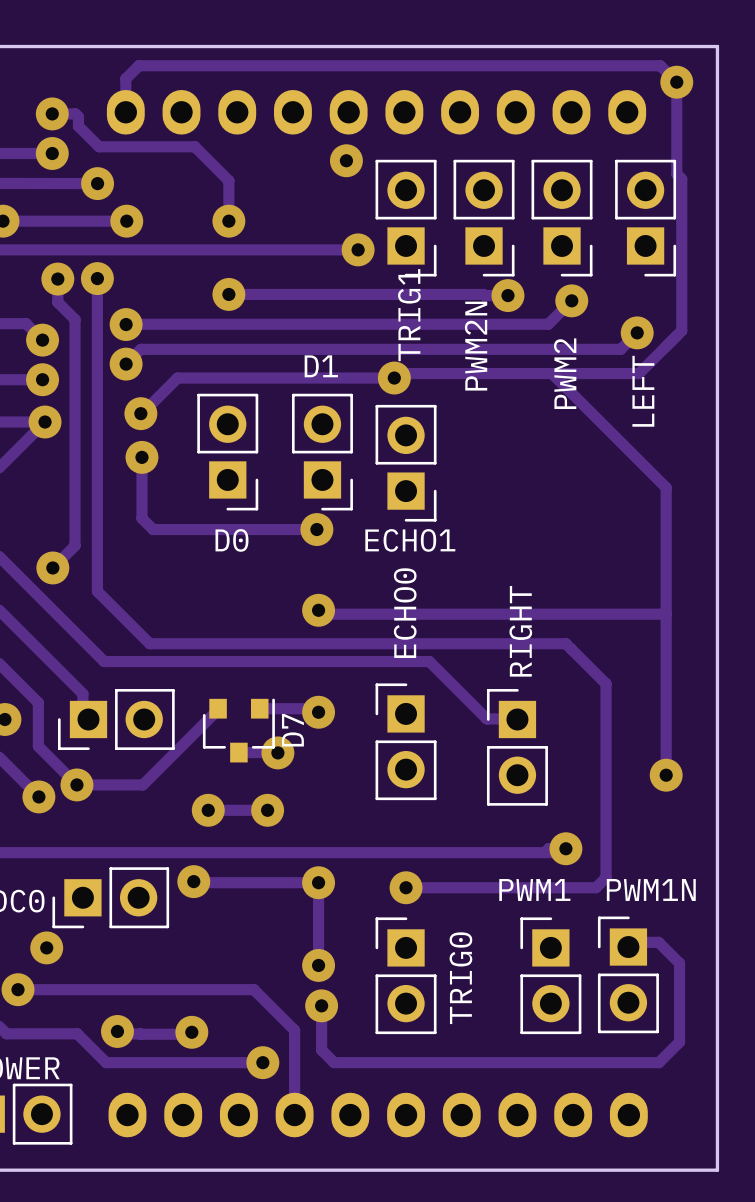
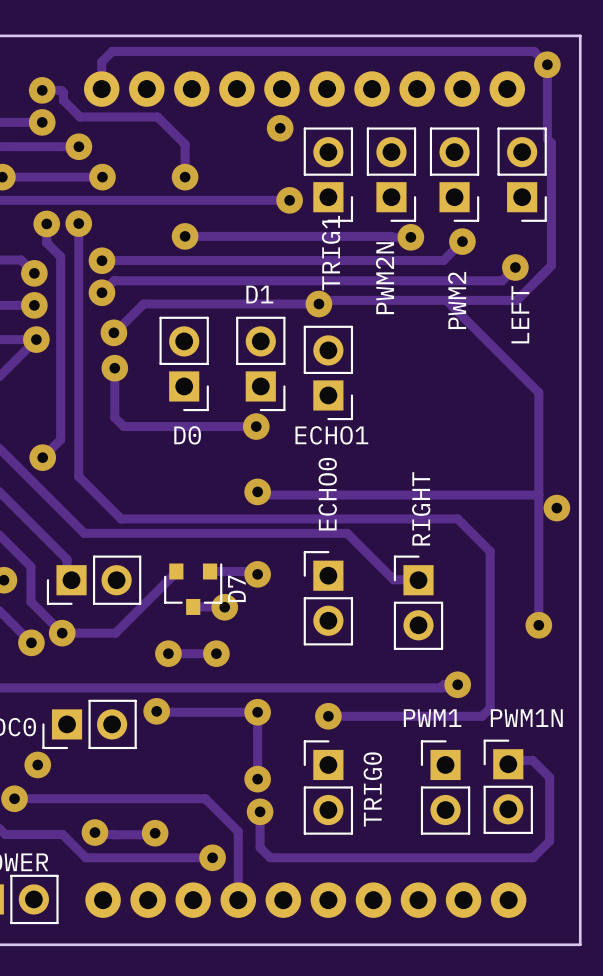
part footprint: [106, 89, 647, 135] -> [83, 71, 526, 107]
via: none -> (556, 508)
part footprint: [108, 1092, 648, 1138] -> [85, 882, 527, 918]

